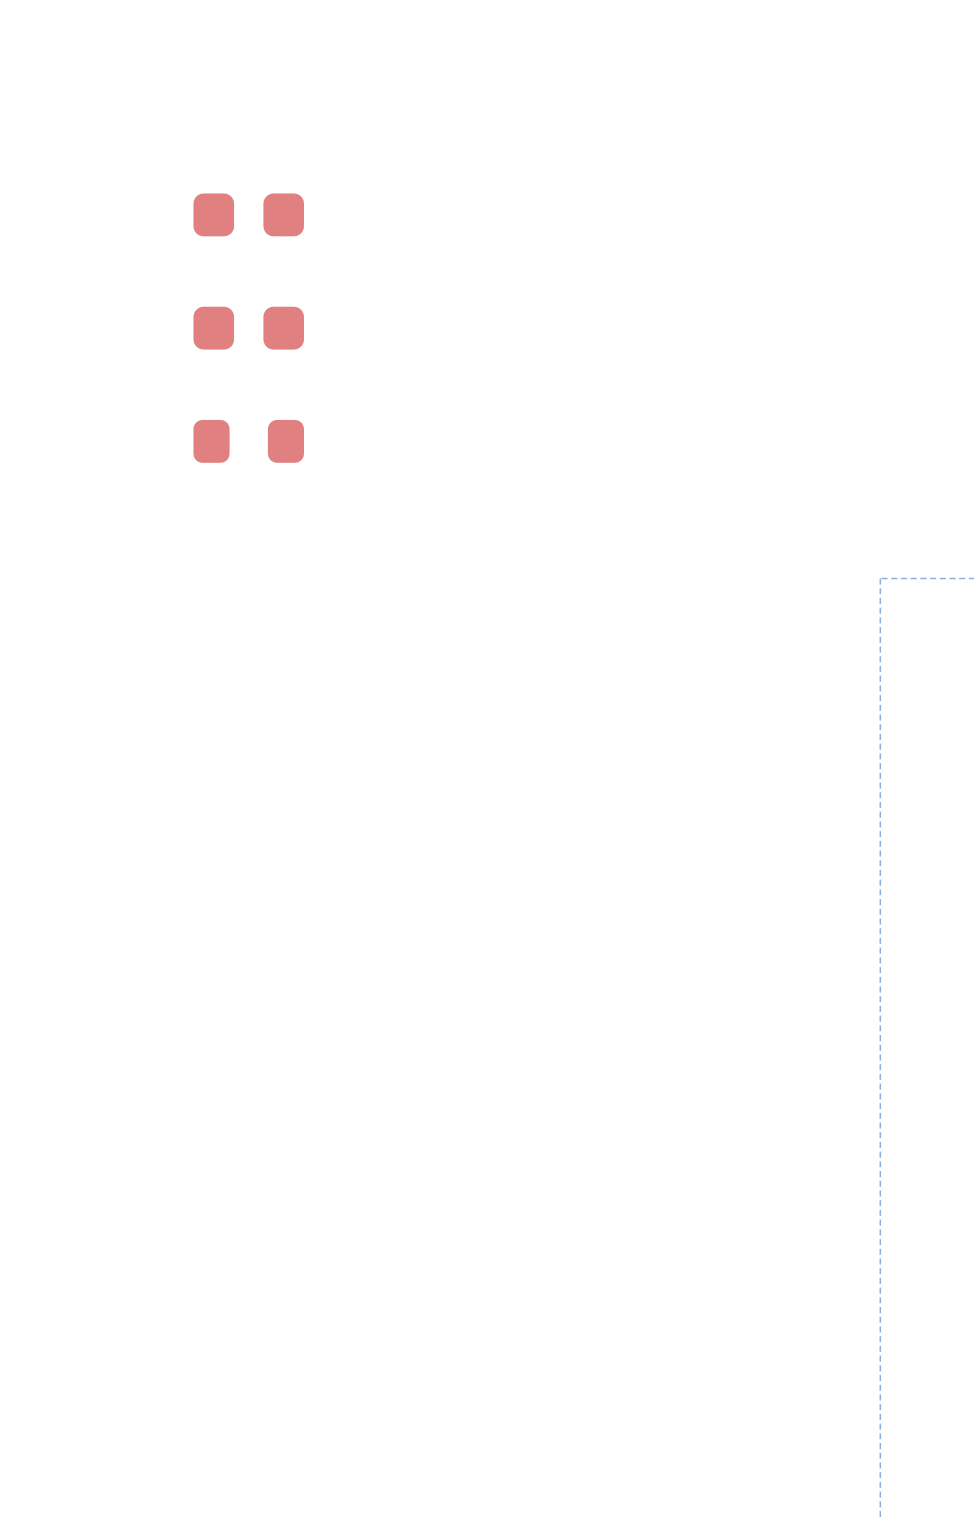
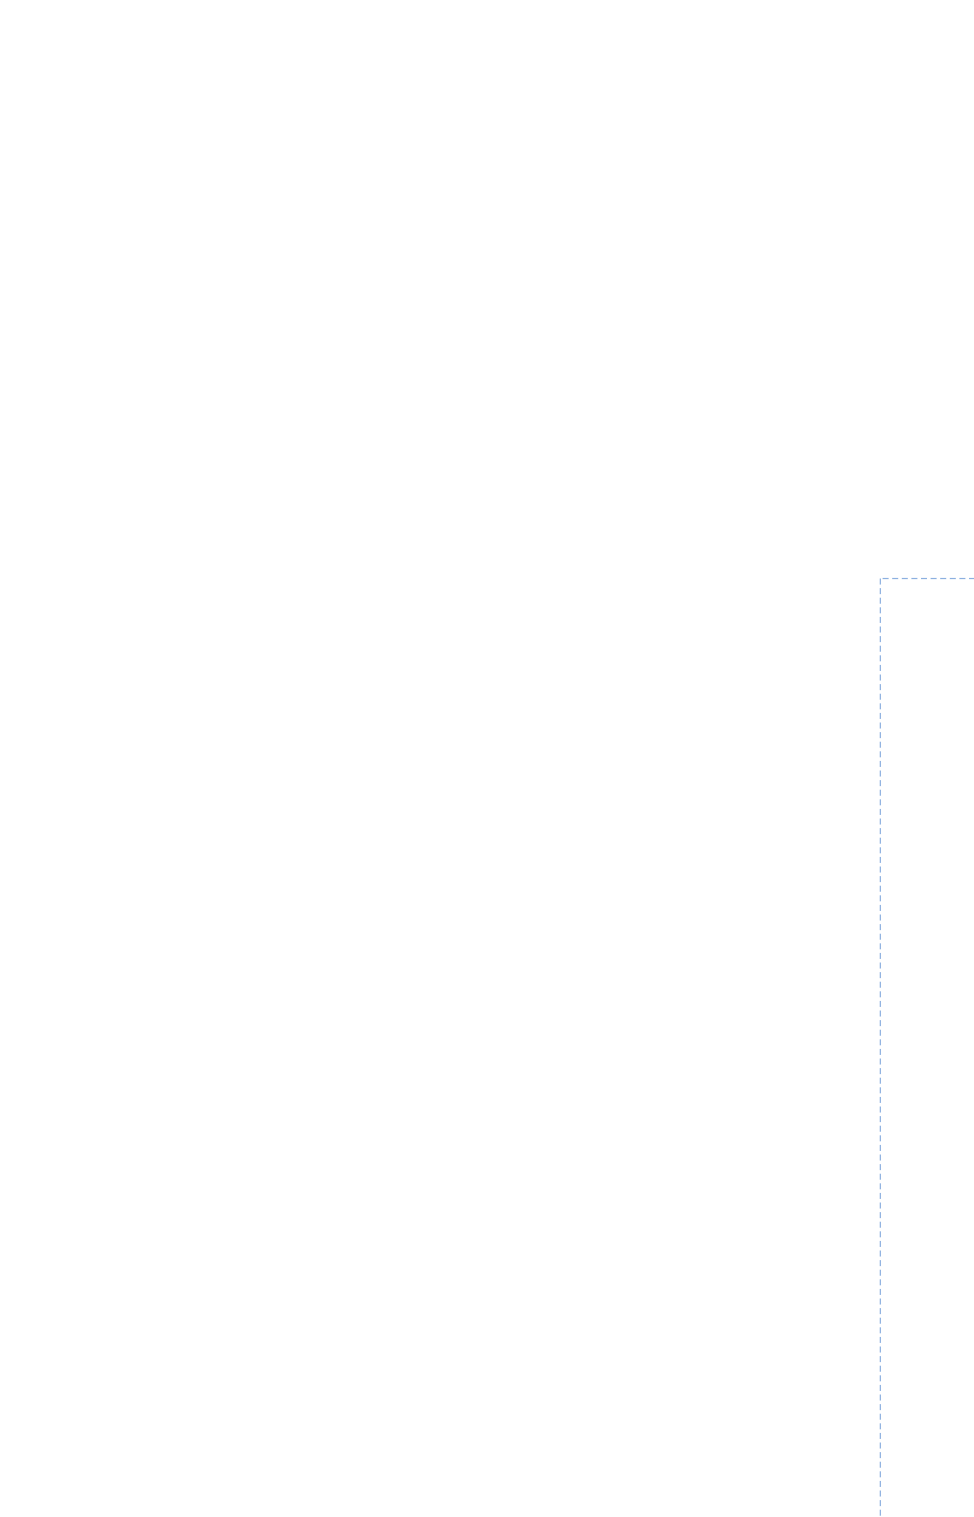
part: (248, 214) -> none
part: (248, 328) -> none
part: (248, 441) -> none

